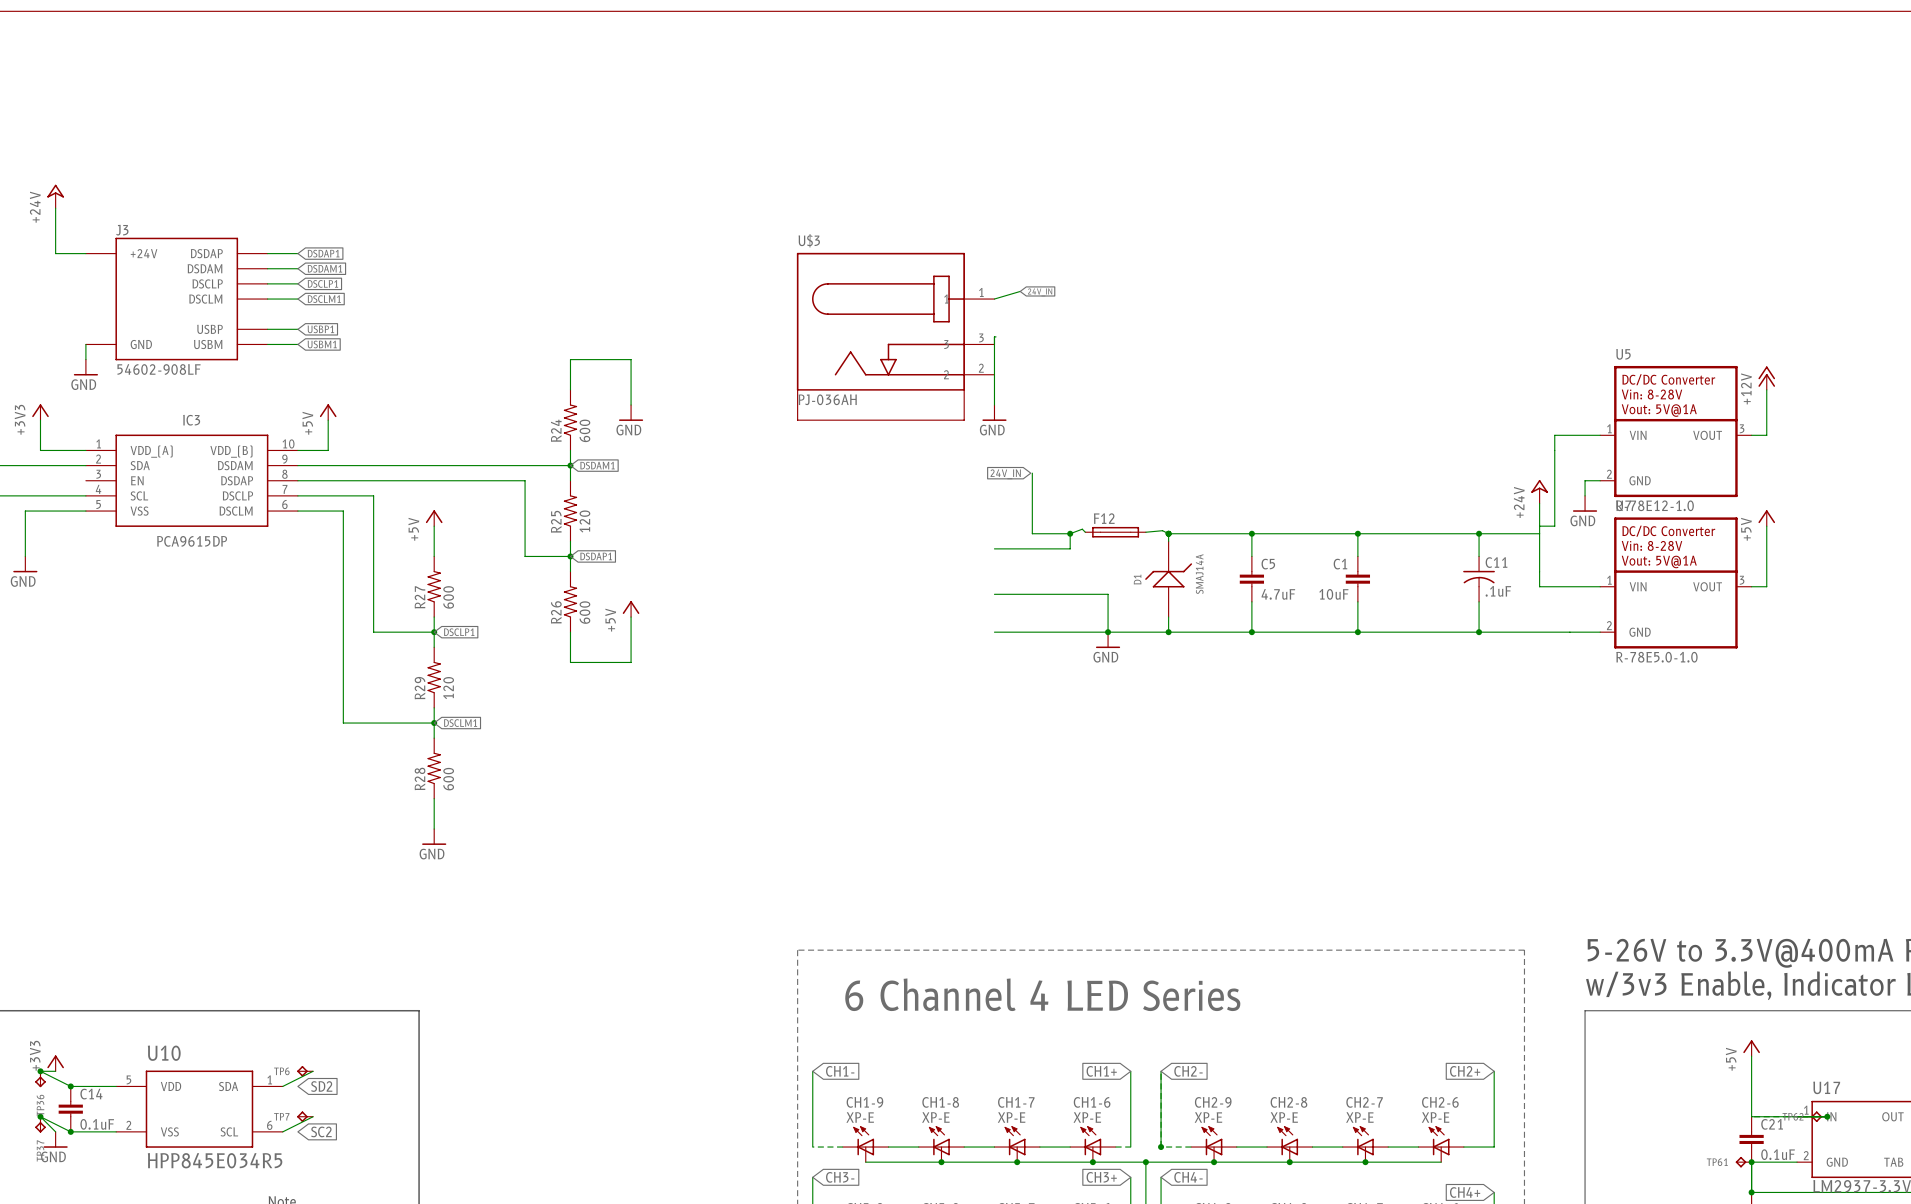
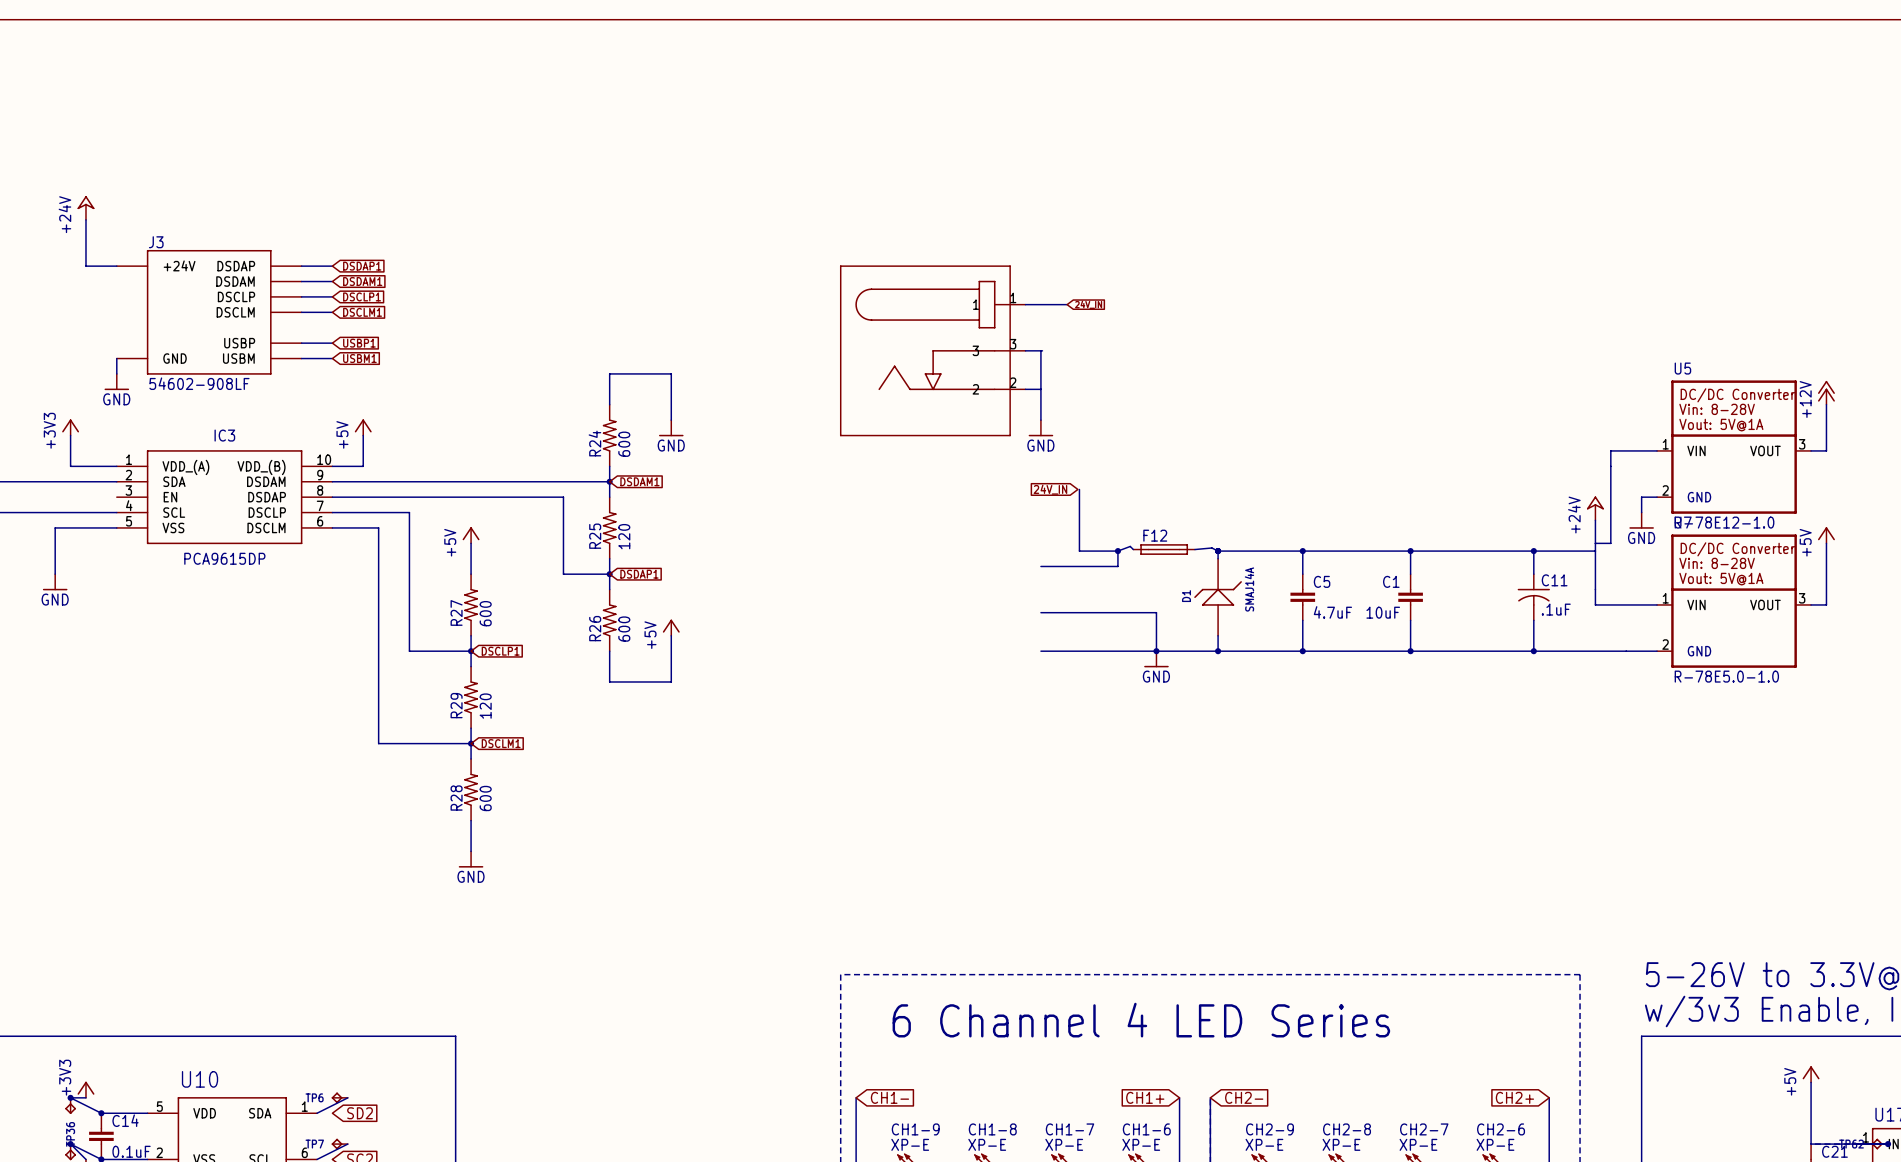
wire: (1020, 291) (994, 299) -> (1067, 304) (1025, 304)
U$3: PJ-036AH (895, 321) -> none
part: none -> (940, 335)
wire: none -> (1025, 350) (1040, 350)

